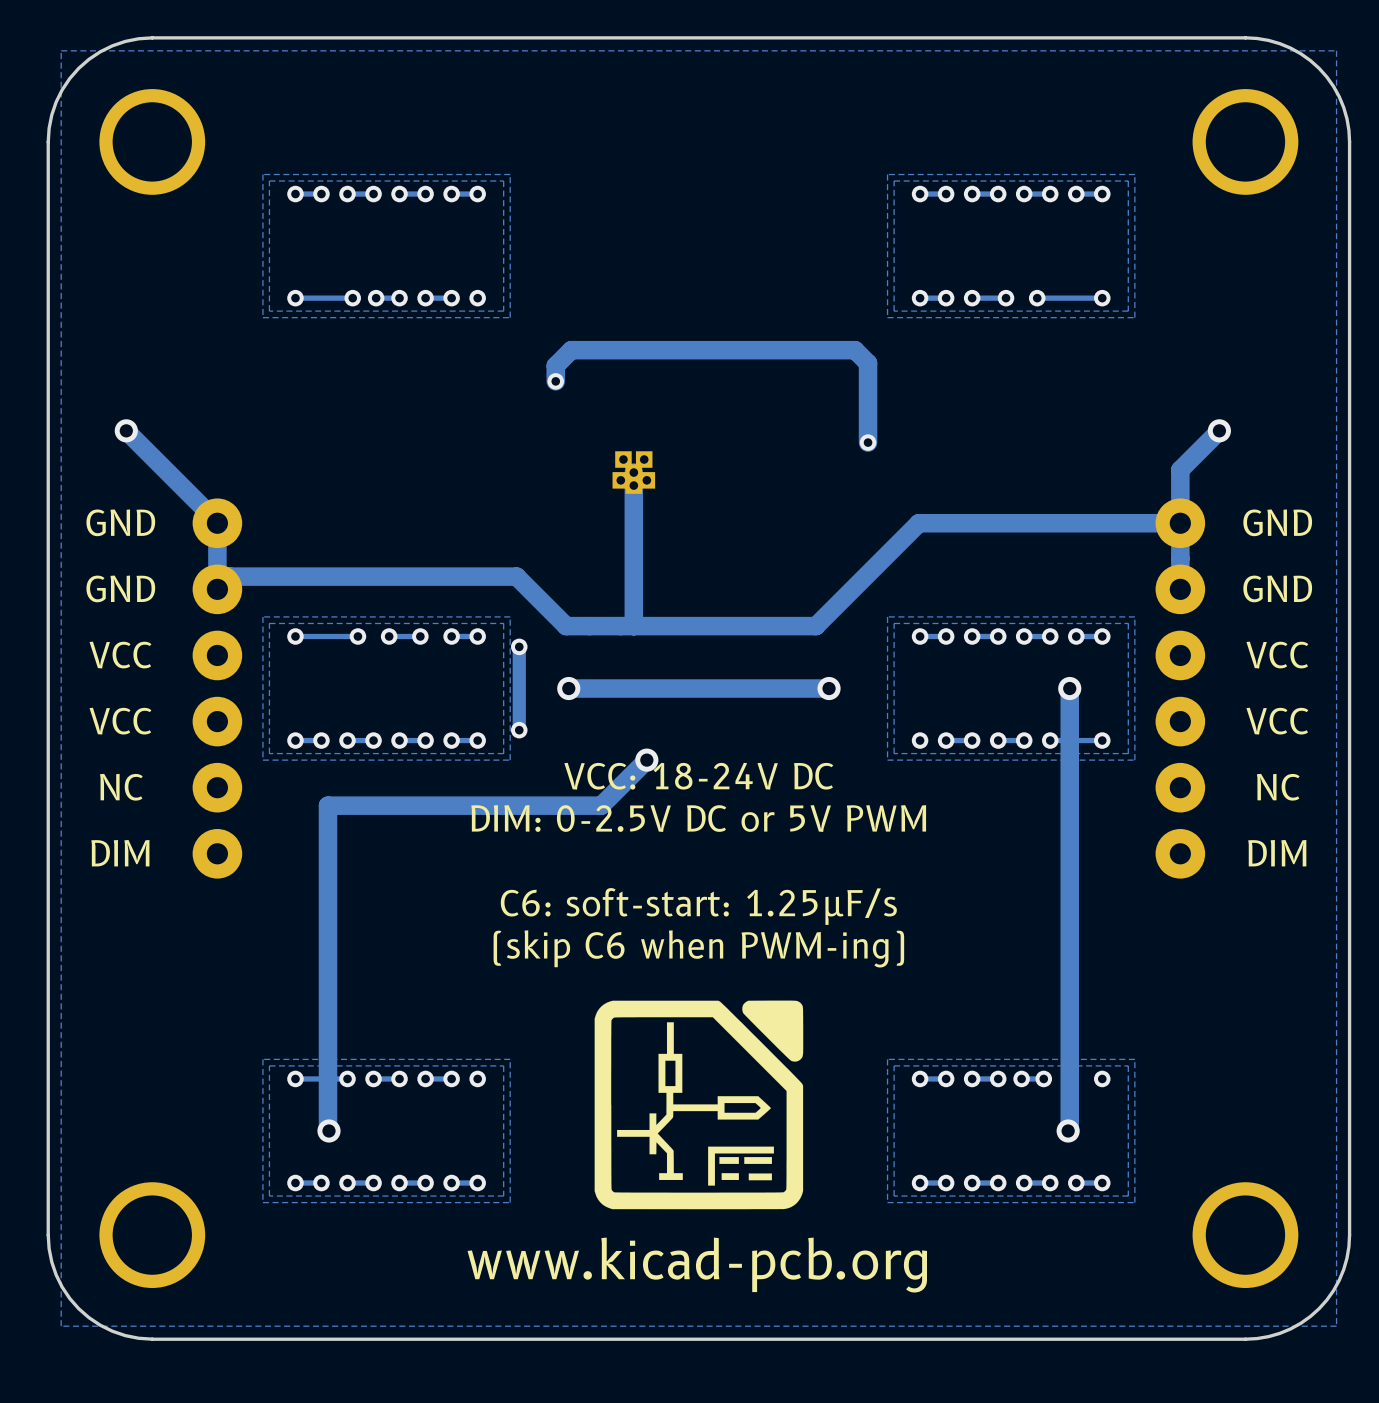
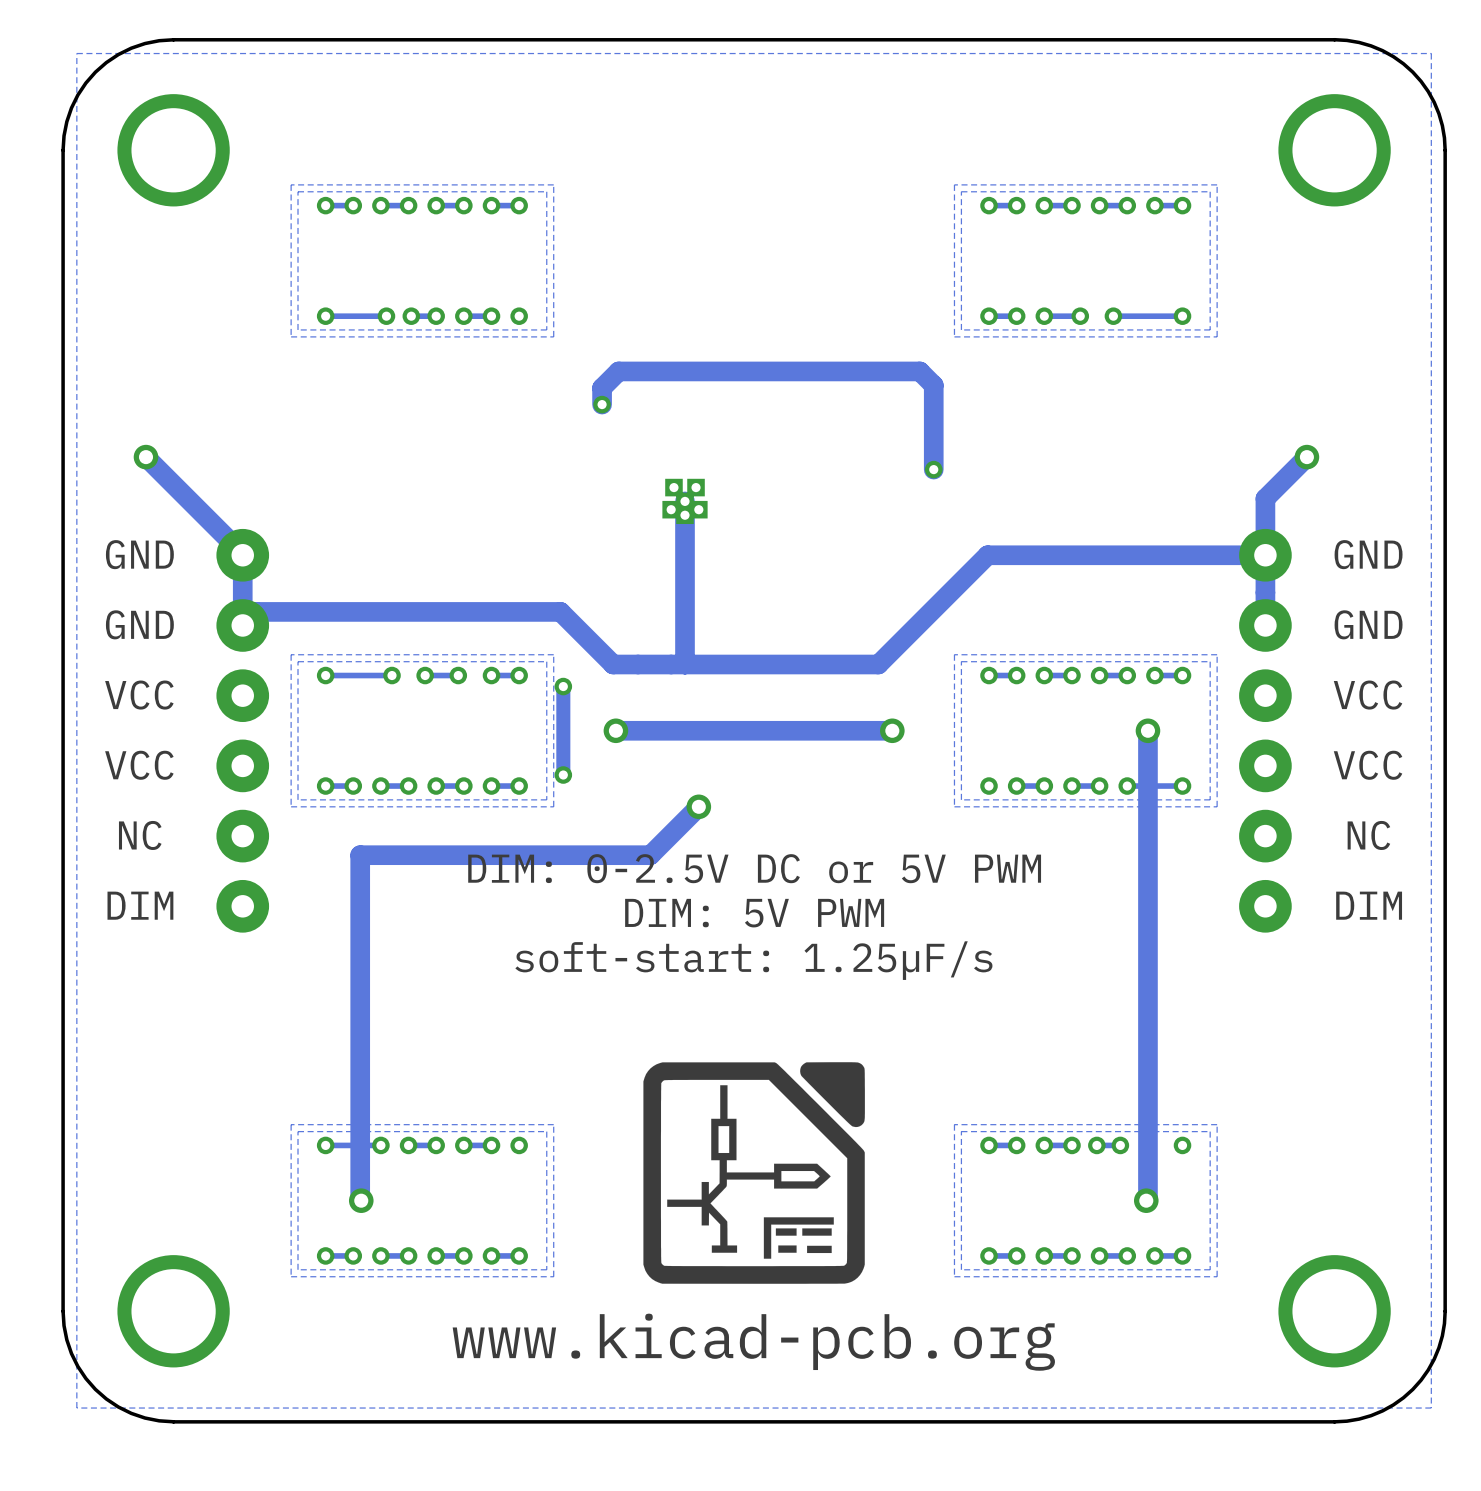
text: VCC: 18-24V DC (698, 776) -> none
text: none -> DIM: 5V PWM (754, 913)
text: C6: soft-start: 1.25µF/s (698, 906) -> soft-start: 1.25µF/s (753, 960)
text: (skip C6 when PWM-ing) (698, 948) -> none

